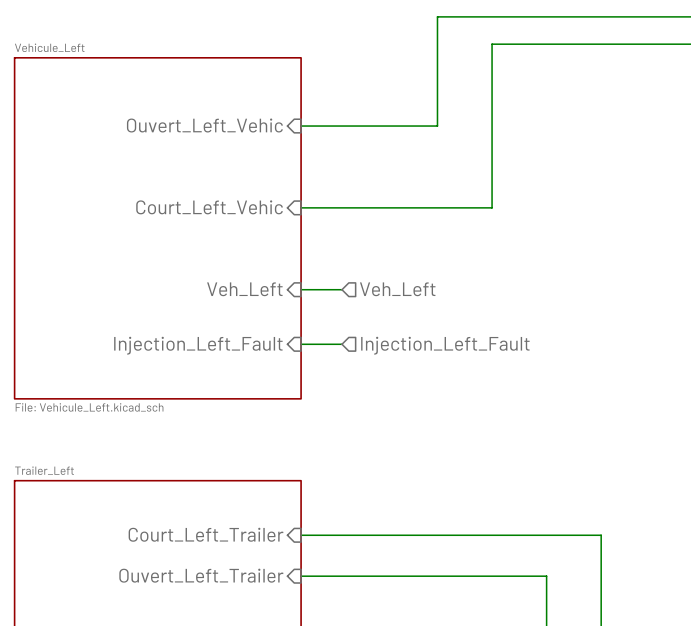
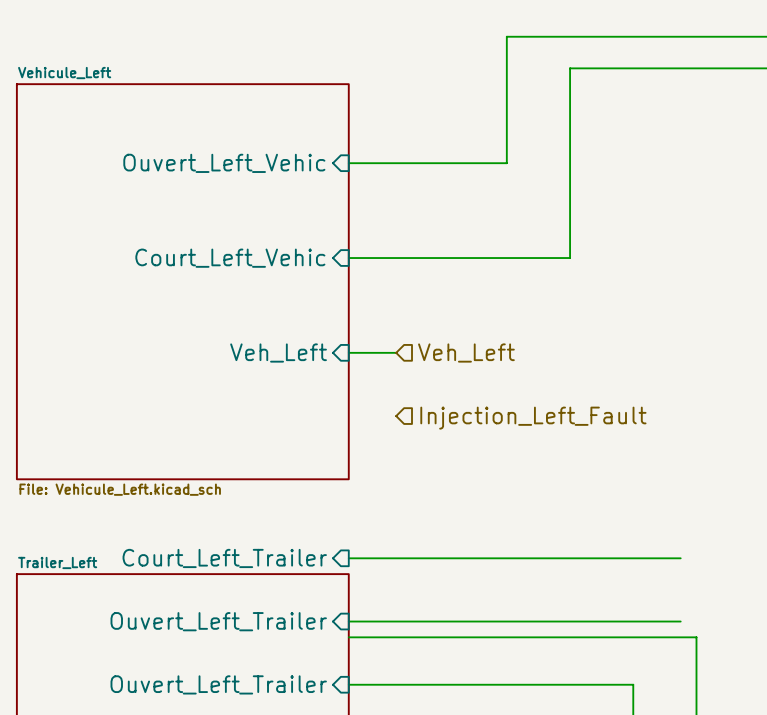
wire: (301, 344) (341, 344) -> none
sheet pin: Injection_Left_Fault (198, 345) -> none
wire: none -> (348, 558) (680, 558)
sheet pin: none -> Ouvert_Left_Trailer (218, 621)
wire: none -> (348, 621) (680, 621)
sheet pin position: Court_Left_Trailer (206, 534) -> Court_Left_Trailer (224, 558)

